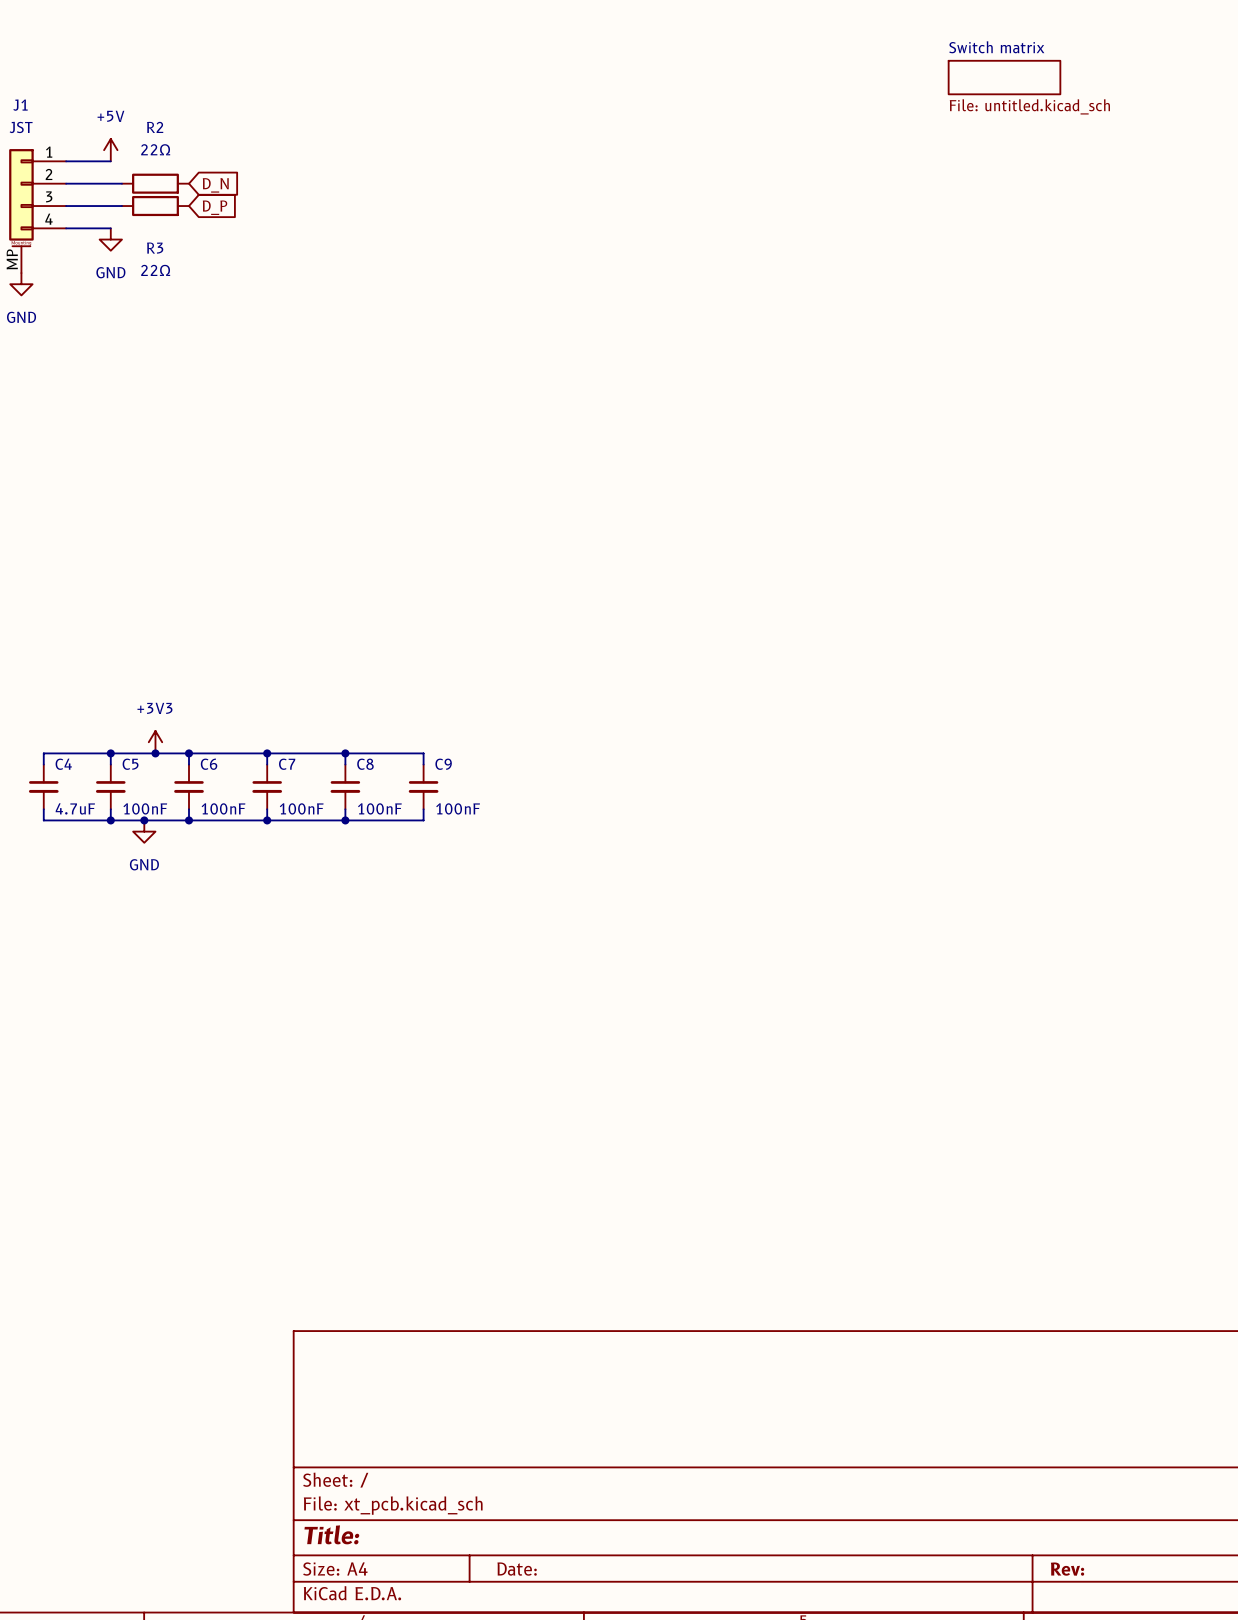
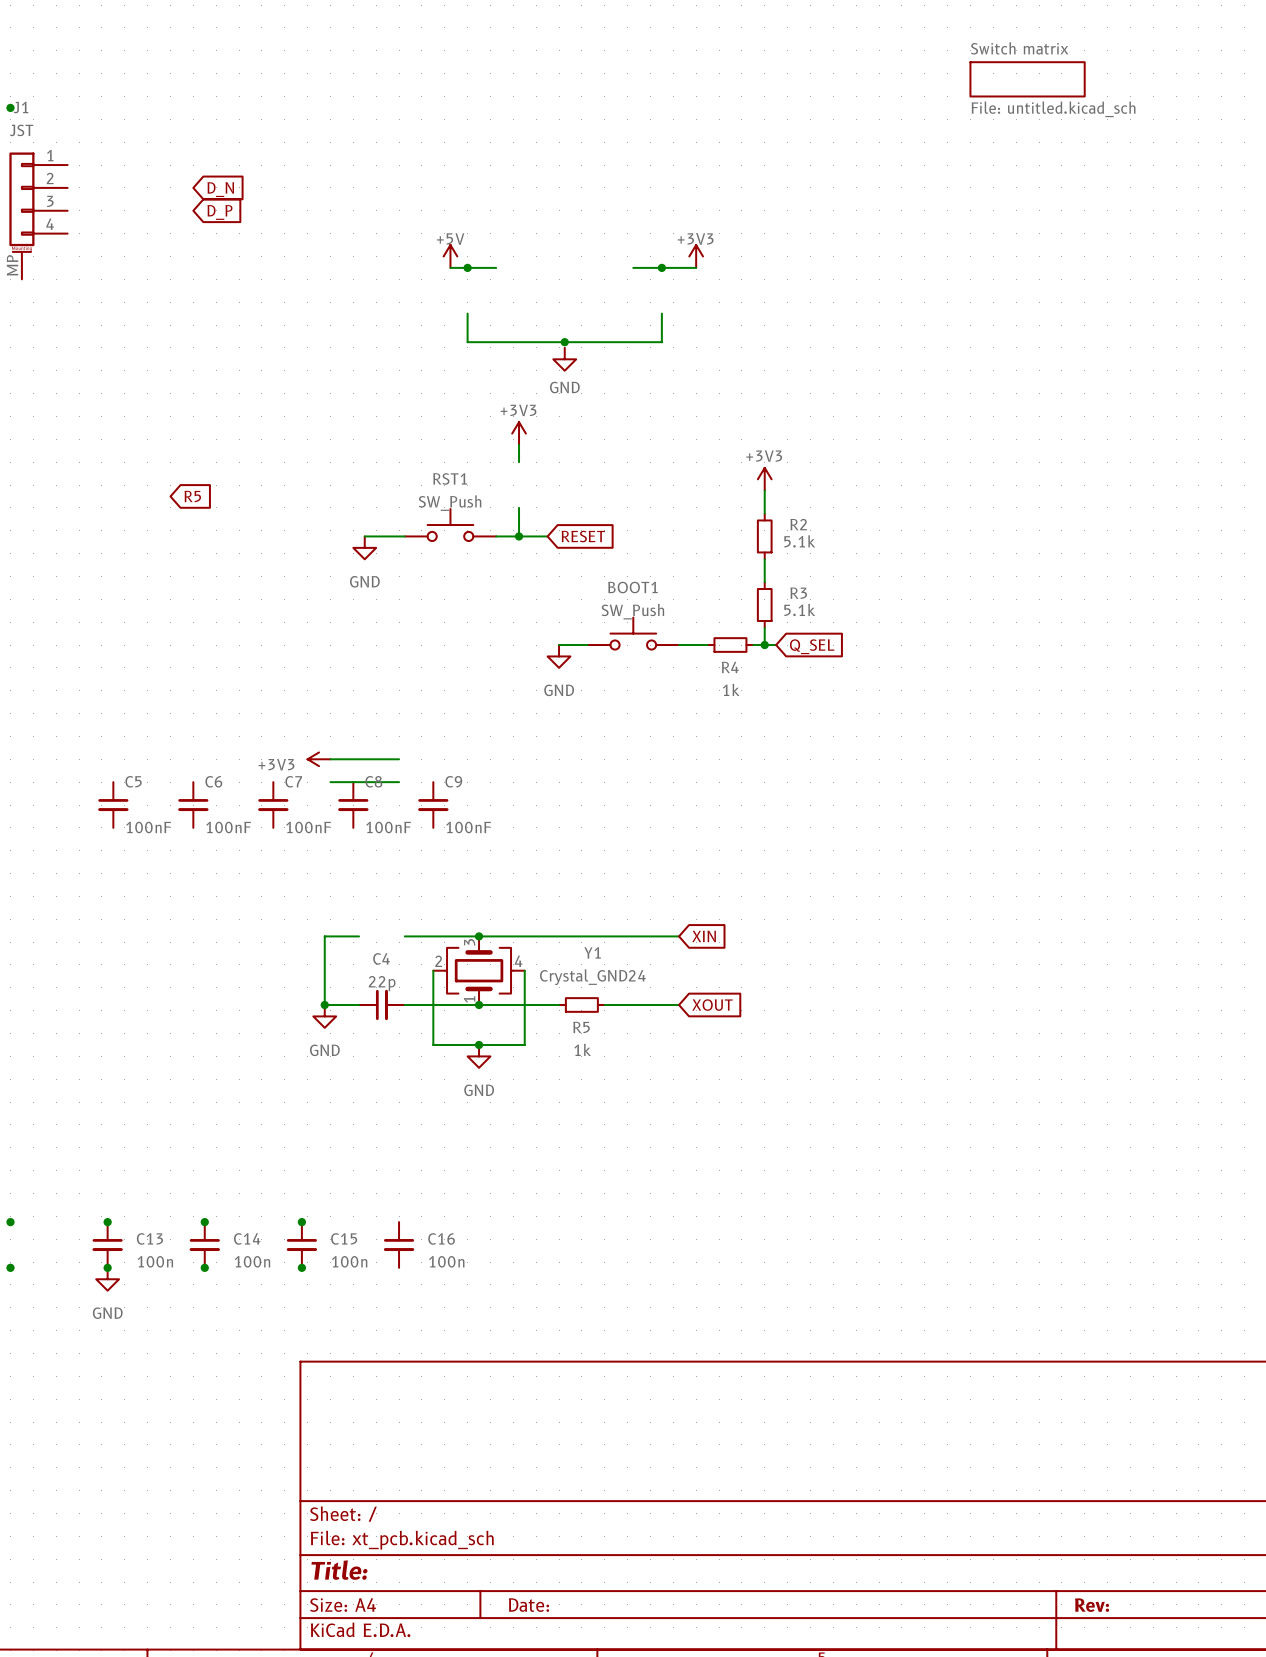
junction: none -> (10, 107)
R2 name position: R2 (155, 127) -> R2 (798, 524)
R2 value: 22Ω (155, 149) -> 5.1k (799, 541)
power symbol: +5V (110, 150) -> none
wire: (66, 161) (110, 161) -> none
R2 symbol: [121, 173, 190, 194] -> [756, 513, 773, 560]
wire: (66, 183) (121, 183) -> none
R3 symbol: [121, 195, 190, 217] -> [756, 582, 773, 628]
wire: (66, 206) (121, 206) -> none
wire: (66, 228) (110, 228) -> none
power symbol: GND (110, 239) -> none
R3 name position: R3 (155, 248) -> R3 (798, 593)
power symbol: none -> +5V (450, 256)
power symbol: none -> +3V3 (696, 256)
wire: none -> (450, 267) (496, 267)
junction: none -> (467, 267)
wire: none -> (633, 267) (696, 267)
junction: none -> (661, 267)
R3 value: 22Ω (155, 270) -> 5.1k (799, 609)
power symbol: GND (21, 284) -> none
wire: none -> (467, 313) (467, 342) (661, 342) (661, 313)
junction: none -> (564, 342)
power symbol: none -> GND (564, 359)
power symbol: none -> +3V3 (519, 433)
wire: none -> (519, 445) (519, 462)
power symbol: none -> +3V3 (764, 479)
wire: none -> (764, 490) (764, 513)
global label: none -> R5 (192, 496)
wire: none -> (519, 507) (519, 536)
RST1: none -> SW_Push (450, 525)
wire: none -> (364, 536) (404, 536)
wire: none -> (496, 536) (547, 536)
junction: none -> (519, 536)
global label: none -> RESET (583, 536)
power symbol: none -> GND (364, 547)
wire: none -> (764, 559) (764, 582)
wire: none -> (764, 627) (764, 645)
BOOT1: none -> SW_Push (633, 633)
wire: none -> (559, 645) (587, 645)
wire: none -> (679, 645) (707, 645)
R4: none -> 1k (730, 645)
wire: none -> (753, 645) (776, 645)
junction: none -> (764, 645)
global label: none -> Q_SEL (812, 646)
power symbol: none -> GND (559, 656)
power symbol rotation: 0° (155, 742) -> 90° counterclockwise (319, 759)
power symbol position: +3V3 (155, 742) -> +3V3 (319, 759)
wire: none -> (330, 759) (399, 759)
wire: (110, 753) (110, 764) -> none
junction: (110, 753) -> none
junction: (155, 753) -> none
wire: (189, 753) (189, 764) -> none
junction: (189, 753) -> none
wire: (267, 753) (267, 764) -> none
junction: (267, 753) -> none
wire: (345, 753) (345, 764) -> none
junction: (345, 753) -> none
wire: (43, 764) (43, 753) (423, 753) (423, 764) -> none
C4 name position: C4 (63, 764) -> C4 (381, 958)
wire: none -> (330, 782) (399, 782)
C4 rotation: 0° (43, 786) -> 90° counterclockwise (381, 1004)
C4 position: (43, 786) -> (381, 1004)
C4 value: 4.7uF (75, 808) -> 22p (382, 983)
wire: (43, 809) (43, 820) (423, 820) (423, 809) -> none
wire: (110, 809) (110, 820) -> none
wire: (189, 809) (189, 820) -> none
wire: (267, 809) (267, 820) -> none
wire: (345, 809) (345, 820) -> none
junction: (110, 820) -> none
junction: (144, 820) -> none
junction: (189, 820) -> none
junction: (267, 820) -> none
junction: (345, 820) -> none
power symbol: GND (144, 831) -> none
wire: none -> (359, 936) (324, 936) (324, 1004) (359, 1004)
wire: none -> (404, 936) (679, 936)
junction: none -> (479, 936)
global label: none -> XIN (704, 936)
wire: none -> (433, 970) (433, 1044) (524, 1044) (524, 970)
Y1: none -> Crystal_GND24 (479, 970)
junction: none -> (324, 1004)
wire: none -> (404, 1004) (559, 1004)
junction: none -> (479, 1004)
R5: none -> 1k (581, 1004)
wire: none -> (604, 1004) (679, 1004)
global label: none -> XOUT (712, 1005)
power symbol: none -> GND (324, 1016)
junction: none -> (479, 1044)
power symbol: none -> GND (479, 1056)
junction: none -> (10, 1222)
junction: none -> (107, 1222)
junction: none -> (204, 1222)
junction: none -> (301, 1222)
C13: none -> 100n (107, 1244)
C14: none -> 100n (204, 1244)
C15: none -> 100n (301, 1244)
C16: none -> 100n (399, 1244)
junction: none -> (10, 1267)
junction: none -> (107, 1267)
junction: none -> (204, 1267)
junction: none -> (301, 1267)
power symbol: none -> GND (107, 1279)

